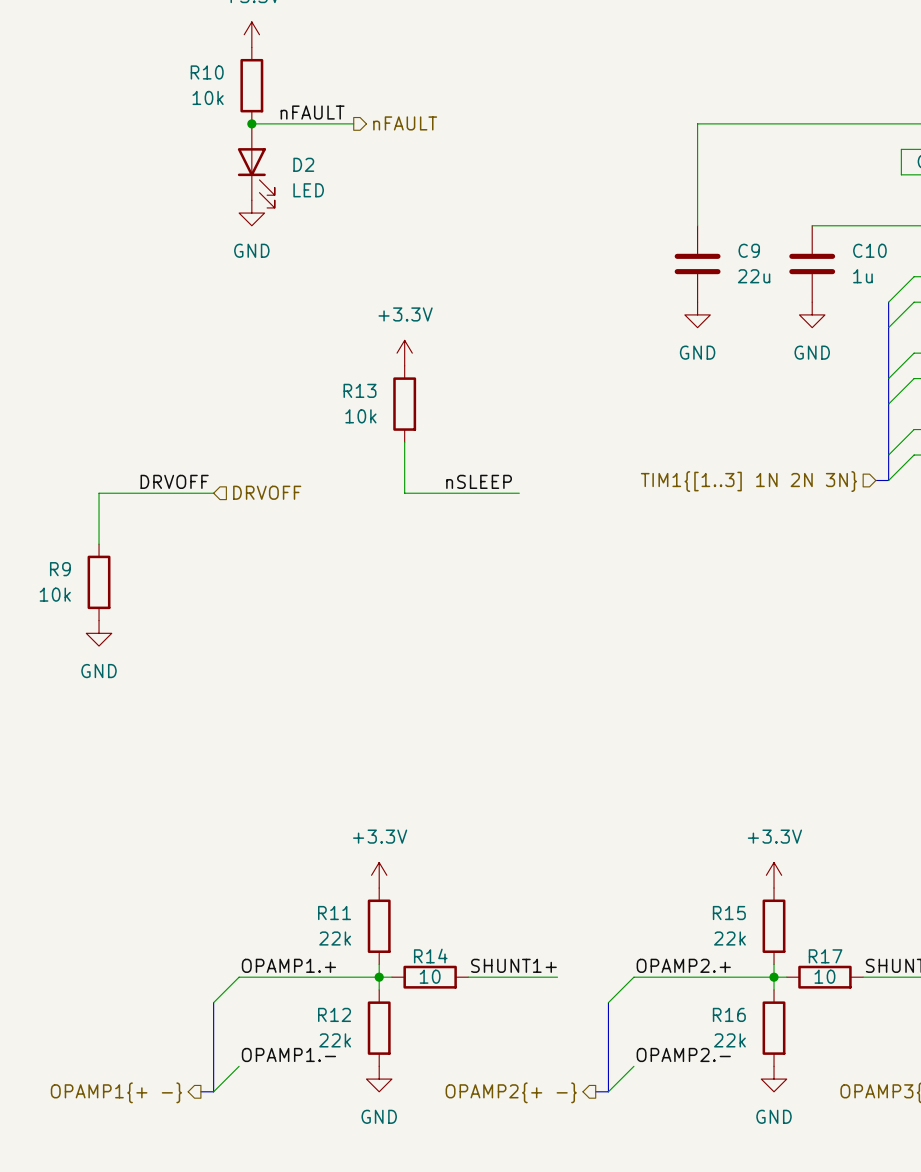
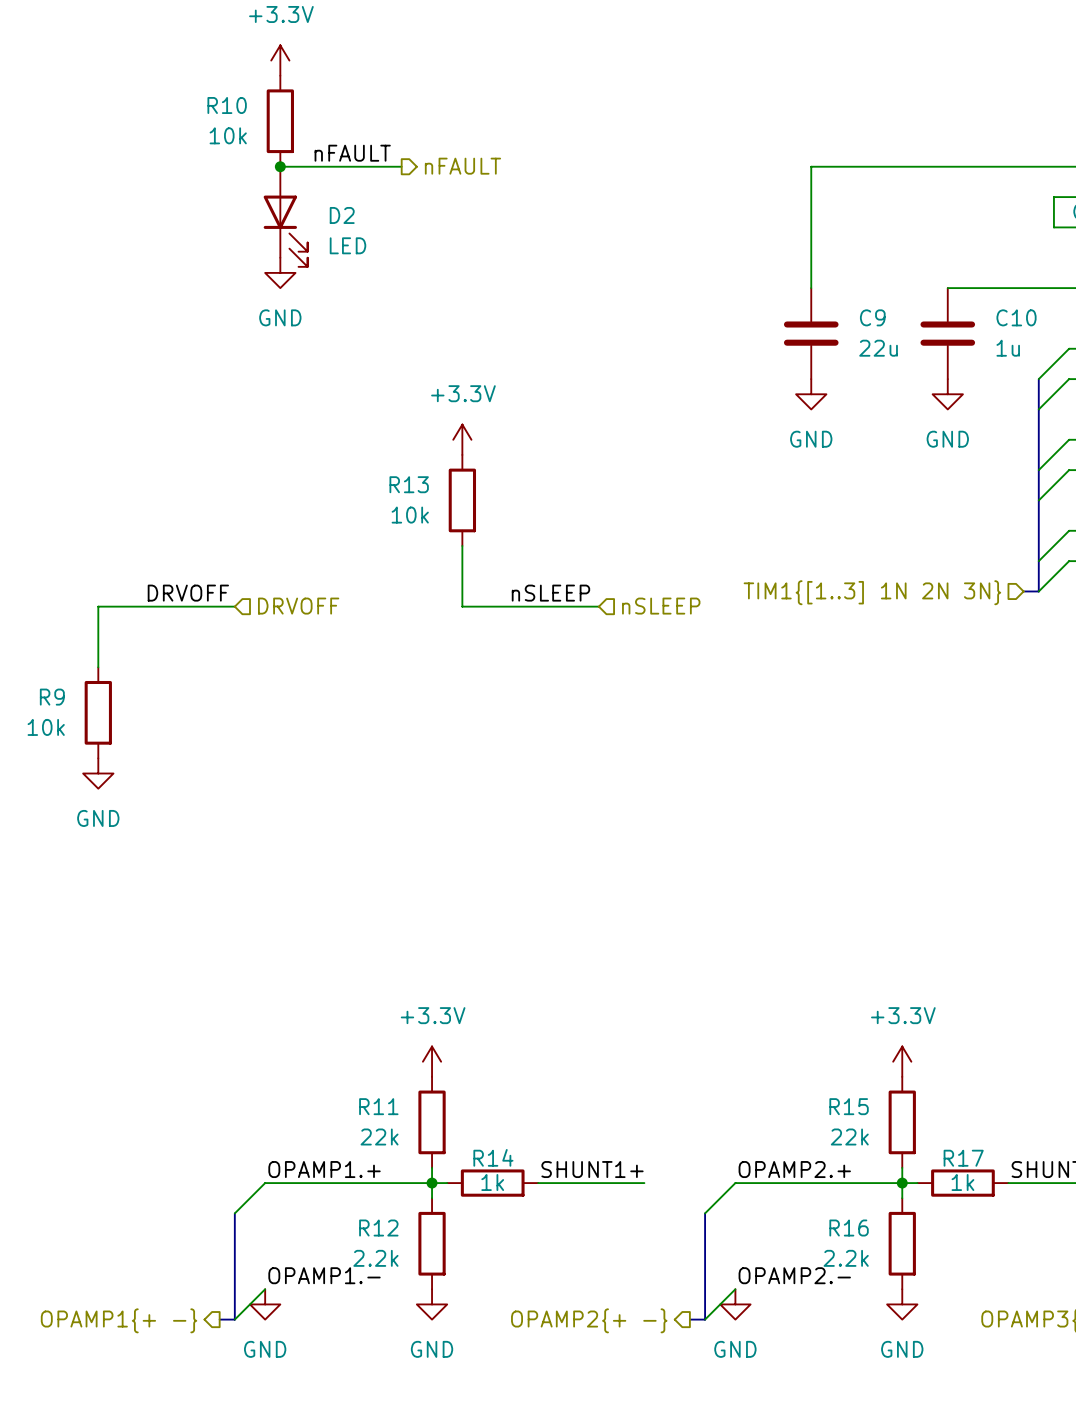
hierarchical label: none -> nSLEEP (661, 606)
R14 value: 10 (430, 976) -> 1k (492, 1182)
R17 value: 10 (824, 976) -> 1k (962, 1182)
R12 value: 22k (335, 1040) -> 2.2k (375, 1258)
R16 value: 22k (729, 1040) -> 2.2k (846, 1258)
power symbol: none -> GND (265, 1304)
power symbol: none -> GND (735, 1304)

